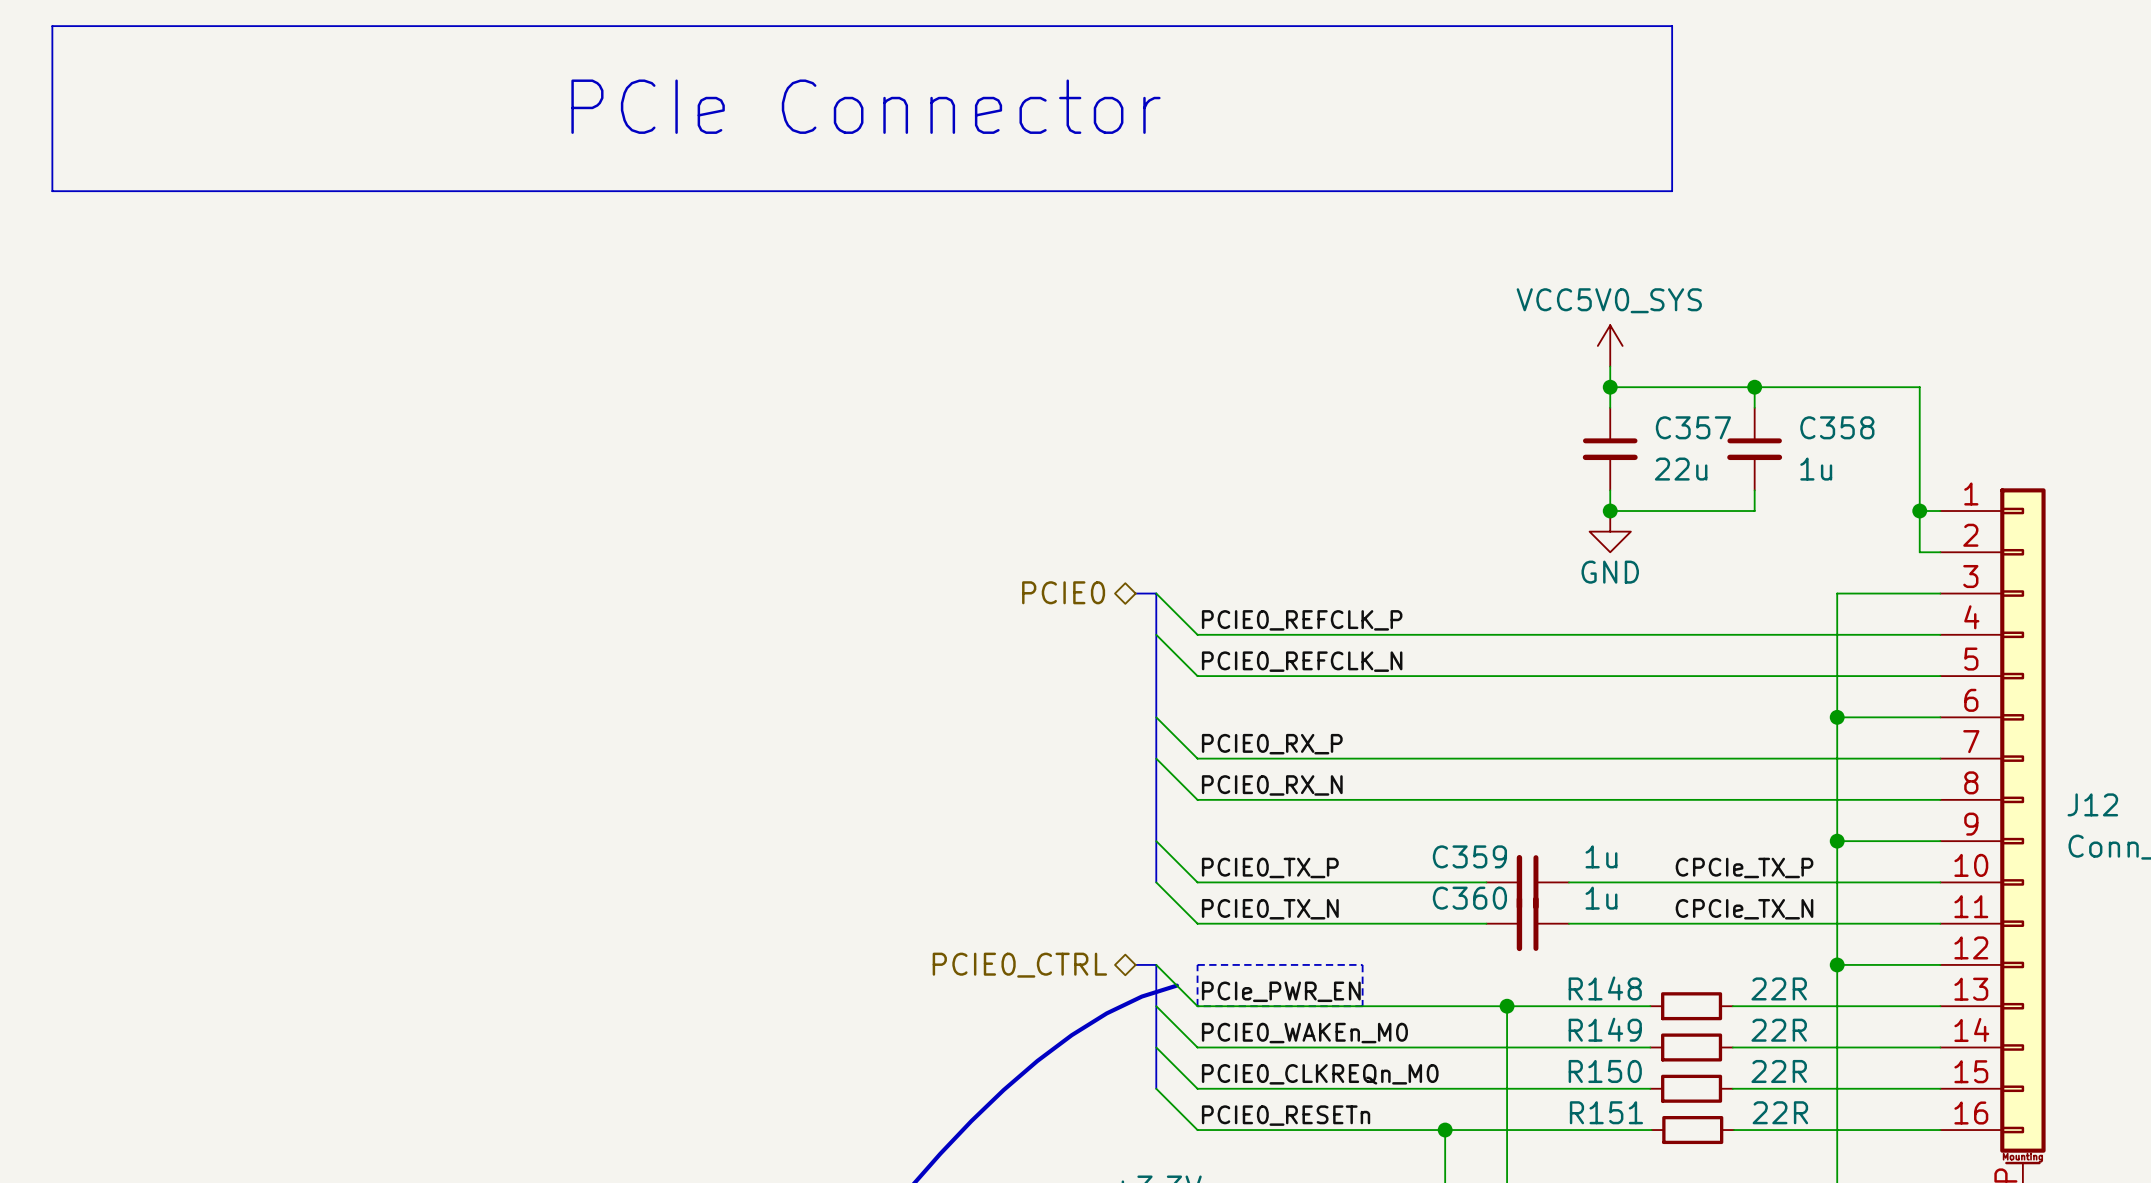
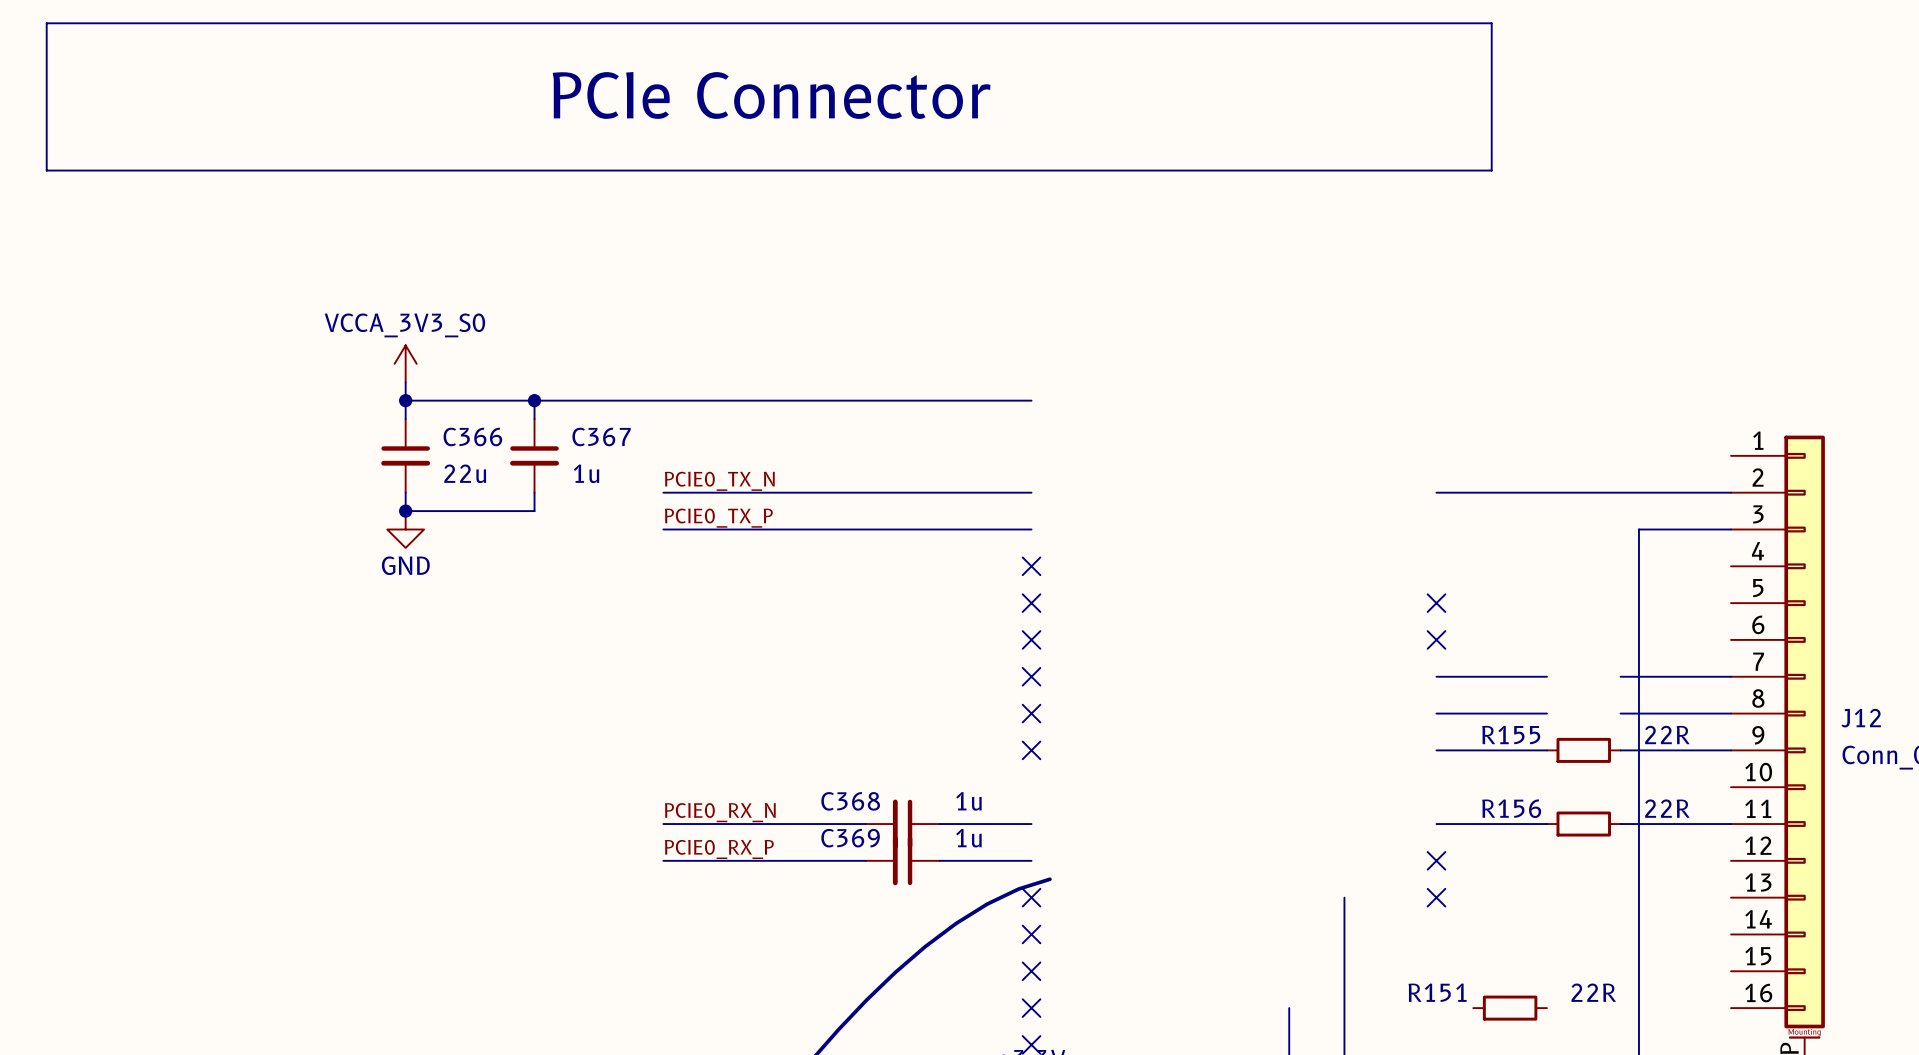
power symbol: VCC5V0_SYS (1610, 345) -> none
wire: (1610, 366) (1610, 407) -> none
wire: (1610, 387) (1919, 387) (1919, 552) -> (1436, 492) (1712, 492)
junction: (1610, 387) -> none
wire: (1754, 387) (1754, 407) -> none
junction: (1754, 387) -> none
power symbol: none -> VCCA_3V3_S0 (405, 363)
wire: none -> (405, 382) (405, 419)
wire: none -> (405, 400) (1031, 400)
junction: none -> (405, 400)
wire: none -> (534, 400) (534, 419)
junction: none -> (534, 400)
C357: 22u (1610, 449) -> none
C358: 1u (1754, 449) -> none
wire: (1610, 490) (1610, 511) (1754, 511) (1754, 490) -> none
C366: none -> 22u (405, 455)
C367: none -> 1u (534, 455)
junction: (1610, 511) -> none
wire: (1919, 511) (1940, 511) -> (1620, 750) (1638, 750)
junction: (1919, 511) -> none
power symbol: GND (1610, 531) -> none
label: none -> PCIE0_TX_N (719, 481)
wire: none -> (405, 492) (405, 511) (534, 511) (534, 492)
wire: none -> (663, 492) (1031, 492)
junction: none -> (405, 511)
label: none -> PCIE0_TX_P (718, 518)
hierarchical label: PCIE0 (1063, 592) -> none
power symbol: none -> GND (405, 529)
bus: (1135, 593) (1156, 593) (1156, 882) -> none
wire: (1156, 593) (1197, 634) (1940, 634) -> (1031, 529) (663, 529)
label: PCIE0_REFCLK_P (1302, 620) -> none
wire: (1156, 634) (1197, 676) (1940, 676) -> none
no-connect mark: none -> (1031, 566)
label: PCIE0_REFCLK_N (1302, 661) -> none
no-connect mark: none -> (1031, 603)
no-connect mark: none -> (1436, 603)
wire: (1156, 717) (1197, 758) (1610, 758) -> none
no-connect mark: none -> (1031, 639)
no-connect mark: none -> (1436, 639)
wire: (1837, 717) (1940, 717) -> none
junction: (1837, 717) -> none
label: PCIE0_RX_P (1272, 744) -> none
wire: (1156, 758) (1197, 799) (1610, 799) -> none
no-connect mark: none -> (1031, 676)
wire: (1734, 758) (1816, 758) -> none
label: PCIE0_RX_N (1272, 785) -> none
no-connect mark: none -> (1031, 713)
wire: (1734, 799) (1816, 799) -> none
wire: (1156, 841) (1197, 882) (1486, 882) -> none
no-connect mark: none -> (1031, 750)
wire: none -> (1436, 750) (1546, 750)
R155: none -> 22R (1583, 750)
junction: (1837, 841) -> none
label: PCIE0_TX_P (1270, 867) -> none
label: CPCIe_TX_P (1744, 867) -> none
wire: (1156, 882) (1197, 923) (1486, 923) -> none
C359: 1u (1527, 882) -> none
wire: (1568, 882) (1940, 882) -> none
label: none -> PCIE0_RX_N (720, 812)
label: PCIE0_TX_N (1270, 909) -> none
label: CPCIe_TX_N (1744, 909) -> none
wire: none -> (663, 824) (865, 824)
C368: none -> 1u (902, 824)
wire: none -> (939, 824) (1031, 824)
C360: 1u (1527, 923) -> none
wire: (1568, 923) (1610, 923) -> none
wire: (1734, 923) (1816, 923) -> none
R156: none -> 22R (1583, 824)
label: none -> PCIE0_RX_P (719, 849)
wire: none -> (663, 860) (865, 860)
C369: none -> 1u (902, 860)
bus: (1135, 964) (1156, 964) (1156, 1088) -> none
wire: (1156, 964) (1197, 1006) (1650, 1006) -> (1031, 860) (939, 860)
line: (1197, 964) (1362, 964) (1362, 1006) (1197, 1006) (1197, 964) -> none
no-connect mark: none -> (1436, 860)
wire: (1837, 964) (1940, 964) -> none
junction: (1837, 964) -> none
hierarchical label: PCIE0_CTRL (1019, 965) -> none
label: PCIe_PWR_EN (1281, 991) -> none
wire: (1156, 1006) (1197, 1047) (1650, 1047) -> none
no-connect mark: none -> (1031, 897)
junction: (1507, 1006) -> none
no-connect mark: none -> (1436, 897)
R148: 22R (1691, 1006) -> none
wire: (1732, 1006) (1940, 1006) -> none
label: PCIE0_WAKEn_M0 (1304, 1033) -> none
wire: (1156, 1047) (1197, 1088) (1650, 1088) -> none
no-connect mark: none -> (1031, 934)
R149: 22R (1691, 1047) -> none
wire: (1732, 1047) (1940, 1047) -> none
label: PCIE0_CLKREQn_M0 (1320, 1074) -> none
wire: (1156, 1088) (1197, 1130) (1651, 1130) -> none
no-connect mark: none -> (1031, 971)
R150: 22R (1691, 1088) -> none
wire: (1732, 1088) (1940, 1088) -> none
label: PCIE0_RESETn (1286, 1115) -> none
no-connect mark: none -> (1031, 1008)
junction: (1445, 1130) -> none
wire: (1734, 1130) (1940, 1130) -> none
no-connect mark: none -> (1031, 1044)

